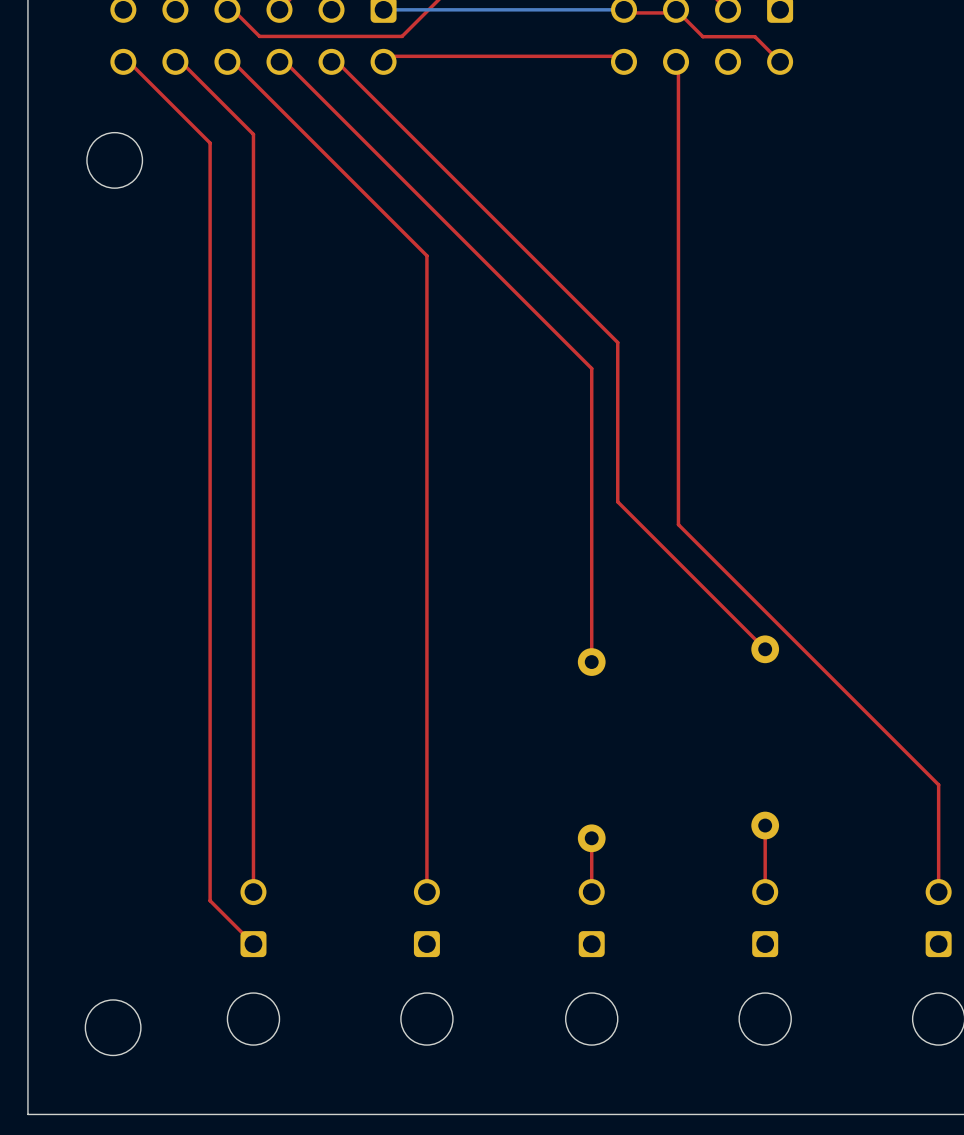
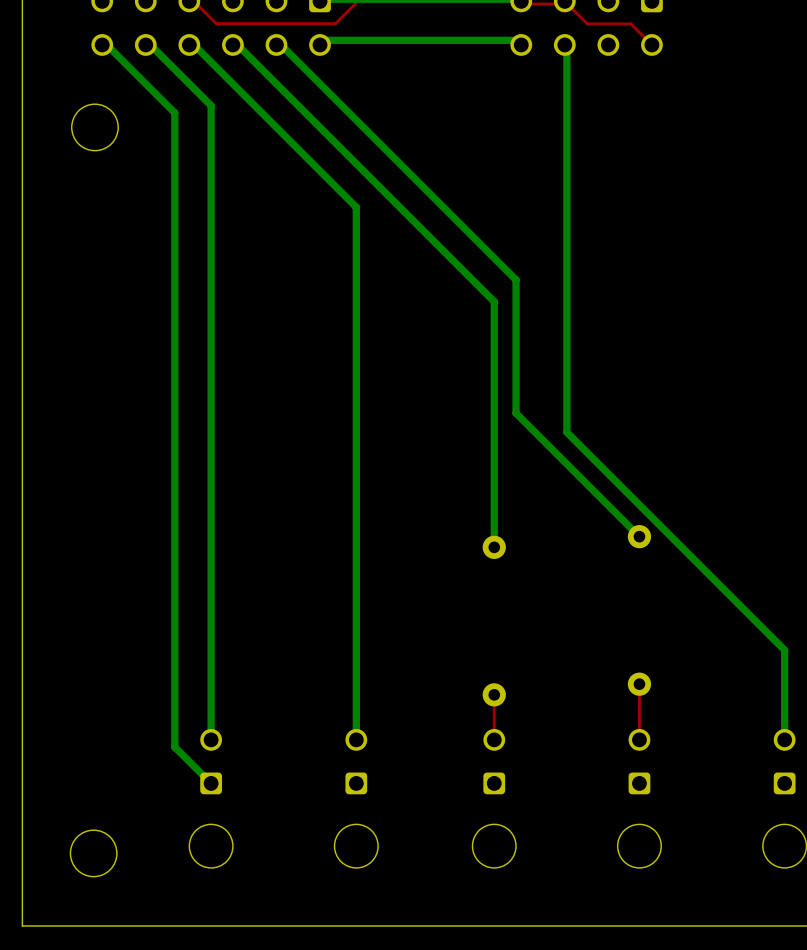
top track: (123, 56) (210, 143) (210, 900) (253, 944) -> none
bottom track: none -> (102, 40) (174, 112) (174, 747) (211, 783)
top track: (175, 56) (253, 134) (253, 892) -> none
bottom track: none -> (145, 40) (211, 105) (211, 739)
top track: (227, 56) (426, 255) (426, 887) -> none
bottom track: none -> (189, 40) (356, 207) (356, 736)
top track: (279, 56) (591, 368) (591, 662) -> none
bottom track: none -> (232, 40) (494, 301) (494, 547)
top track: (331, 56) (617, 342) (617, 501) (765, 649) -> none
bottom track: none -> (276, 40) (516, 279) (516, 413) (639, 536)
top track: (383, 56) (617, 56) (626, 64) -> none
bottom track: none -> (516, 40) (320, 40)
top track: (678, 64) (678, 524) (938, 784) (938, 887) -> none
bottom track: none -> (566, 47) (566, 432) (784, 650) (784, 736)

